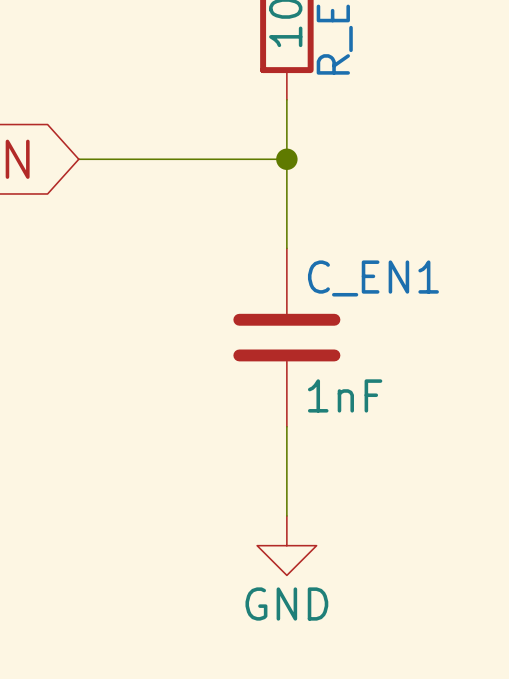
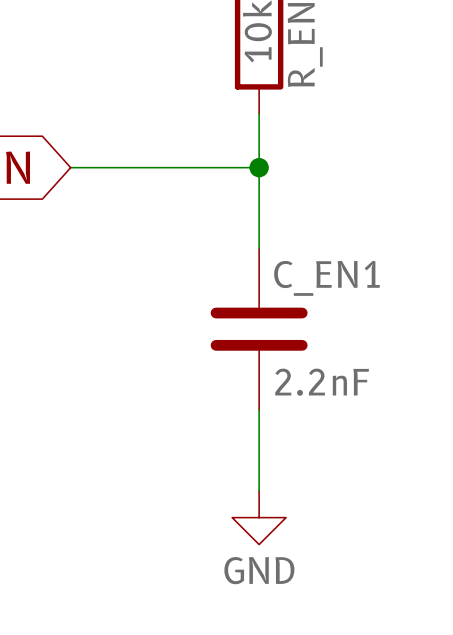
C_EN1 value: 1nF (345, 395) -> 2.2nF (322, 382)

